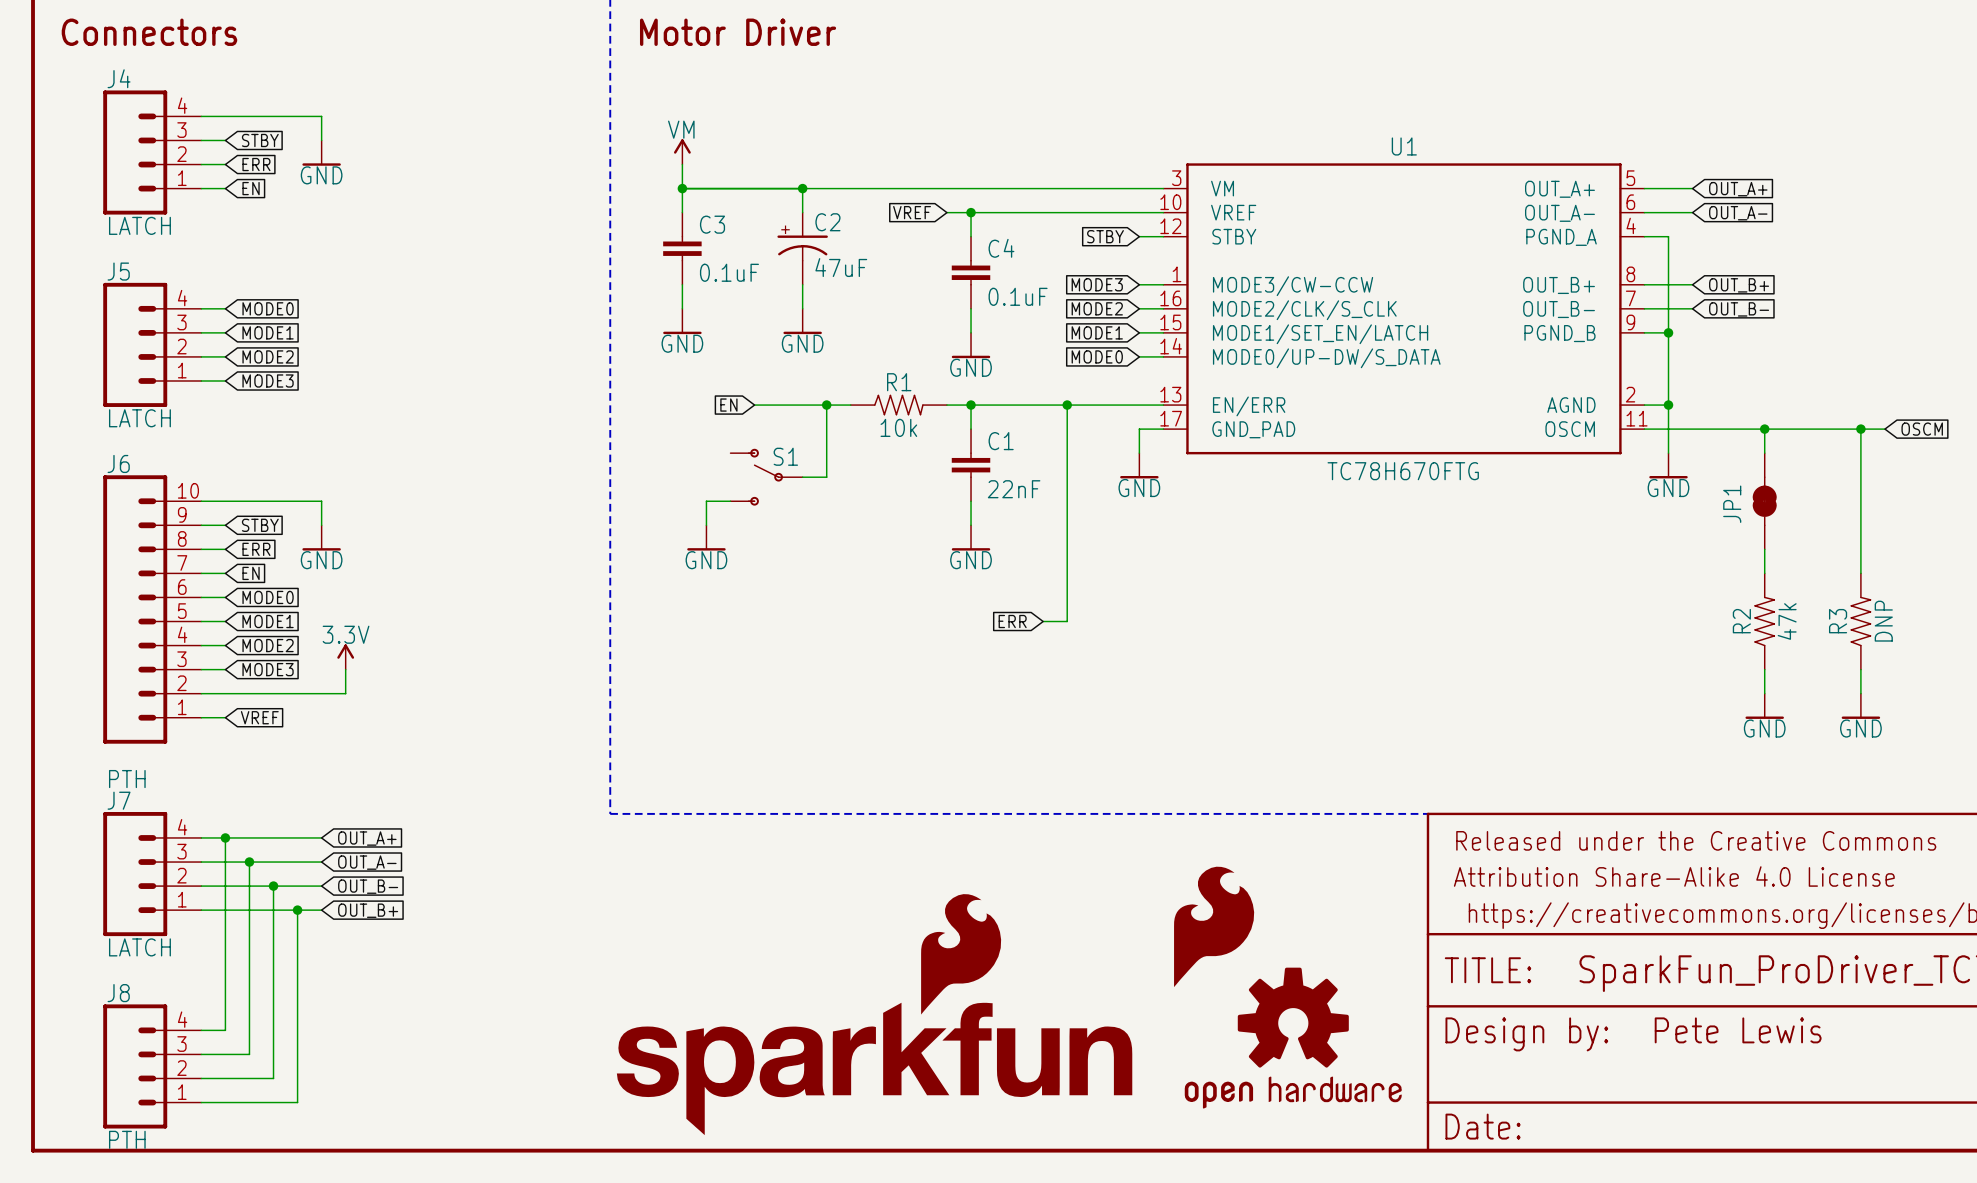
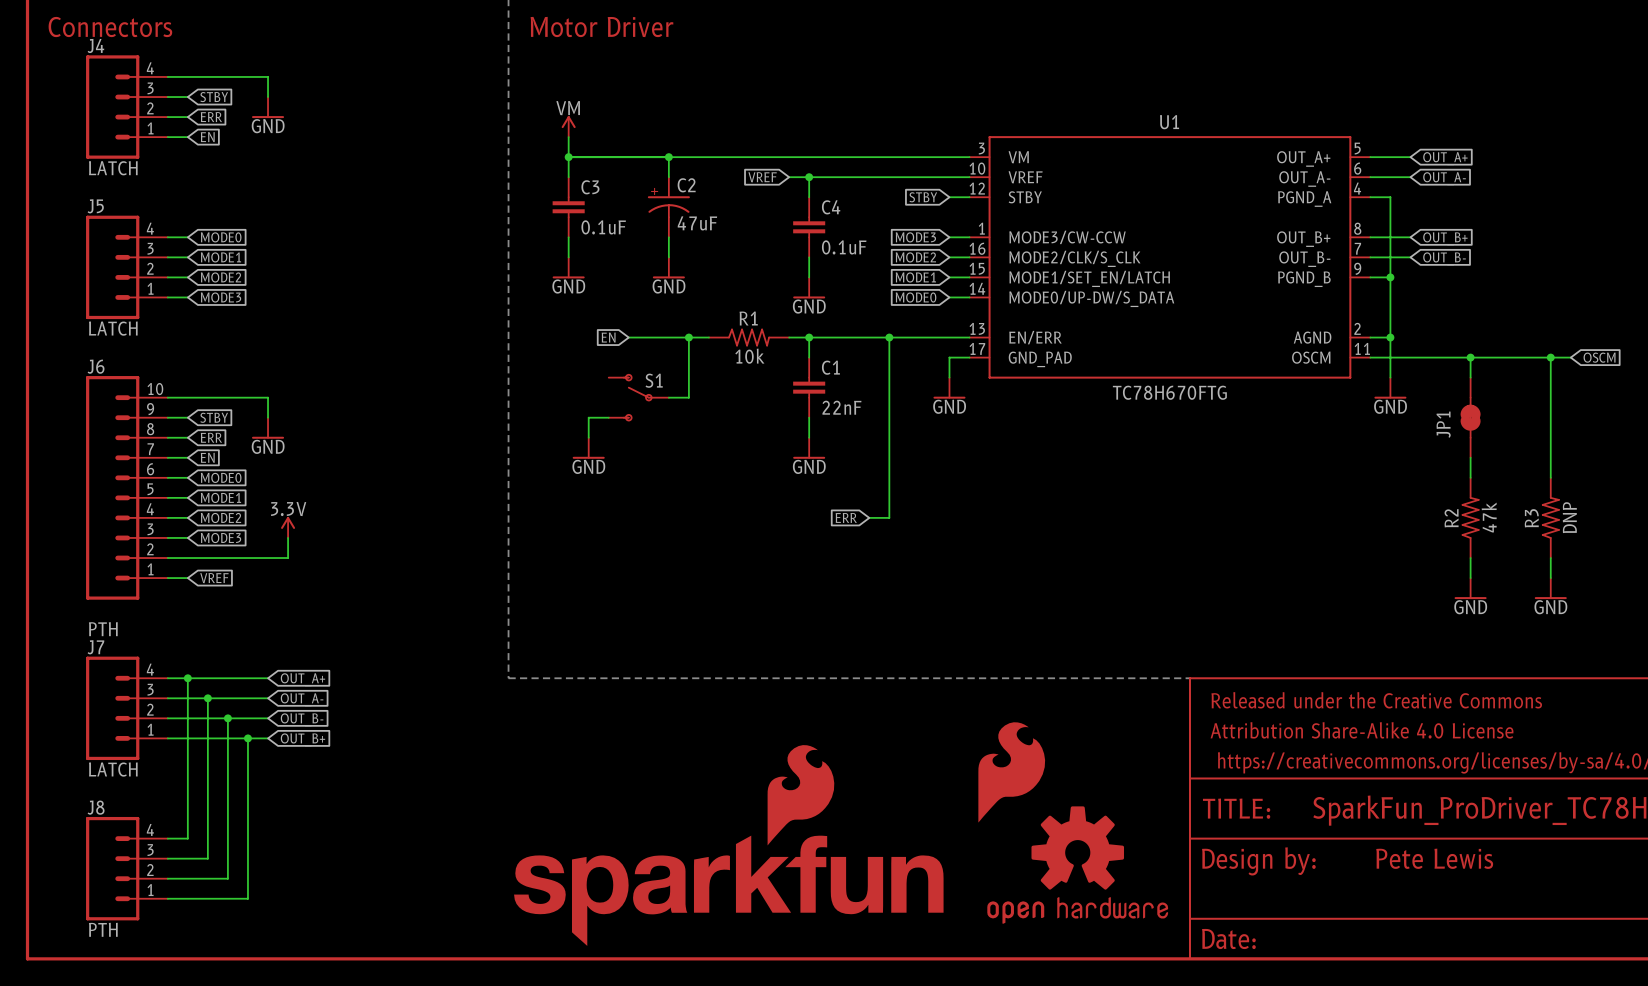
wire: none -> (167, 76) (268, 76) (268, 97)
wire: (225, 116) (321, 116) (321, 140) -> none
global label: none -> STBY (214, 97)
global label: STBY (260, 140) -> ERR (211, 117)
J4 position: (152, 152) -> (126, 107)
power symbol position: GND (321, 153) -> GND (268, 107)
global label: ERR (256, 164) -> EN (207, 137)
wire: (201, 188) (225, 188) -> none
global label: EN (251, 188) -> none
global label: none -> MODE0 (221, 237)
global label: MODE0 (268, 308) -> MODE1 (221, 257)
global label: MODE1 (268, 332) -> MODE2 (221, 277)
J5 position: (152, 344) -> (126, 267)
global label: MODE2 (268, 356) -> MODE3 (221, 297)
wire: (201, 380) (225, 380) -> (167, 237) (187, 237)
global label: MODE3 (268, 380) -> none
wire: none -> (167, 397) (268, 397) (268, 417)
wire: (225, 501) (321, 501) (321, 525) -> none
global label: none -> STBY (214, 417)
global label: STBY (260, 525) -> ERR (211, 437)
power symbol position: GND (321, 537) -> GND (268, 428)
global label: ERR (256, 549) -> EN (207, 457)
global label: EN (251, 573) -> MODE0 (221, 477)
global label: MODE0 (268, 597) -> MODE1 (221, 497)
J6 position: (152, 609) -> (126, 487)
global label: MODE1 (268, 621) -> MODE2 (221, 517)
global label: MODE2 (268, 645) -> MODE3 (221, 538)
power symbol position: 3.3V (345, 656) -> 3.3V (288, 527)
global label: MODE3 (268, 669) -> none
wire: (345, 669) (345, 693) (225, 693) -> (288, 537) (288, 558) (187, 558)
wire: (201, 717) (225, 717) -> none
global label position: VREF (259, 717) -> VREF (214, 578)
wire: none -> (187, 678) (187, 698)
junction: none -> (187, 678)
global label: none -> OUT_A+ (302, 679)
junction: (225, 837) -> none
wire: none -> (207, 698) (207, 718)
junction: none -> (207, 698)
global label: OUT_A+ (367, 838) -> OUT_A- (302, 699)
junction: (249, 862) -> none
wire: none -> (227, 718) (227, 738)
junction: none -> (227, 718)
global label: OUT_A- (367, 862) -> OUT_B- (302, 719)
J7 position: (152, 874) -> (126, 708)
junction: (273, 886) -> none
wire: none -> (247, 738) (247, 758)
junction: none -> (247, 738)
global label: OUT_B- (368, 886) -> OUT_B+ (302, 739)
wire: (201, 910) (321, 910) -> (167, 678) (268, 678)
junction: (297, 910) -> none
global label: OUT_B+ (368, 910) -> none
wire: (225, 1006) (225, 1030) -> (187, 838) (167, 838)
wire: (249, 1030) (249, 1054) -> (207, 858) (187, 858)
wire: (273, 1054) (273, 1078) -> (227, 878) (207, 878)
J8 position: (152, 1066) -> (126, 868)
wire: (297, 1078) (297, 1102) (201, 1102) -> (247, 898) (227, 898)

